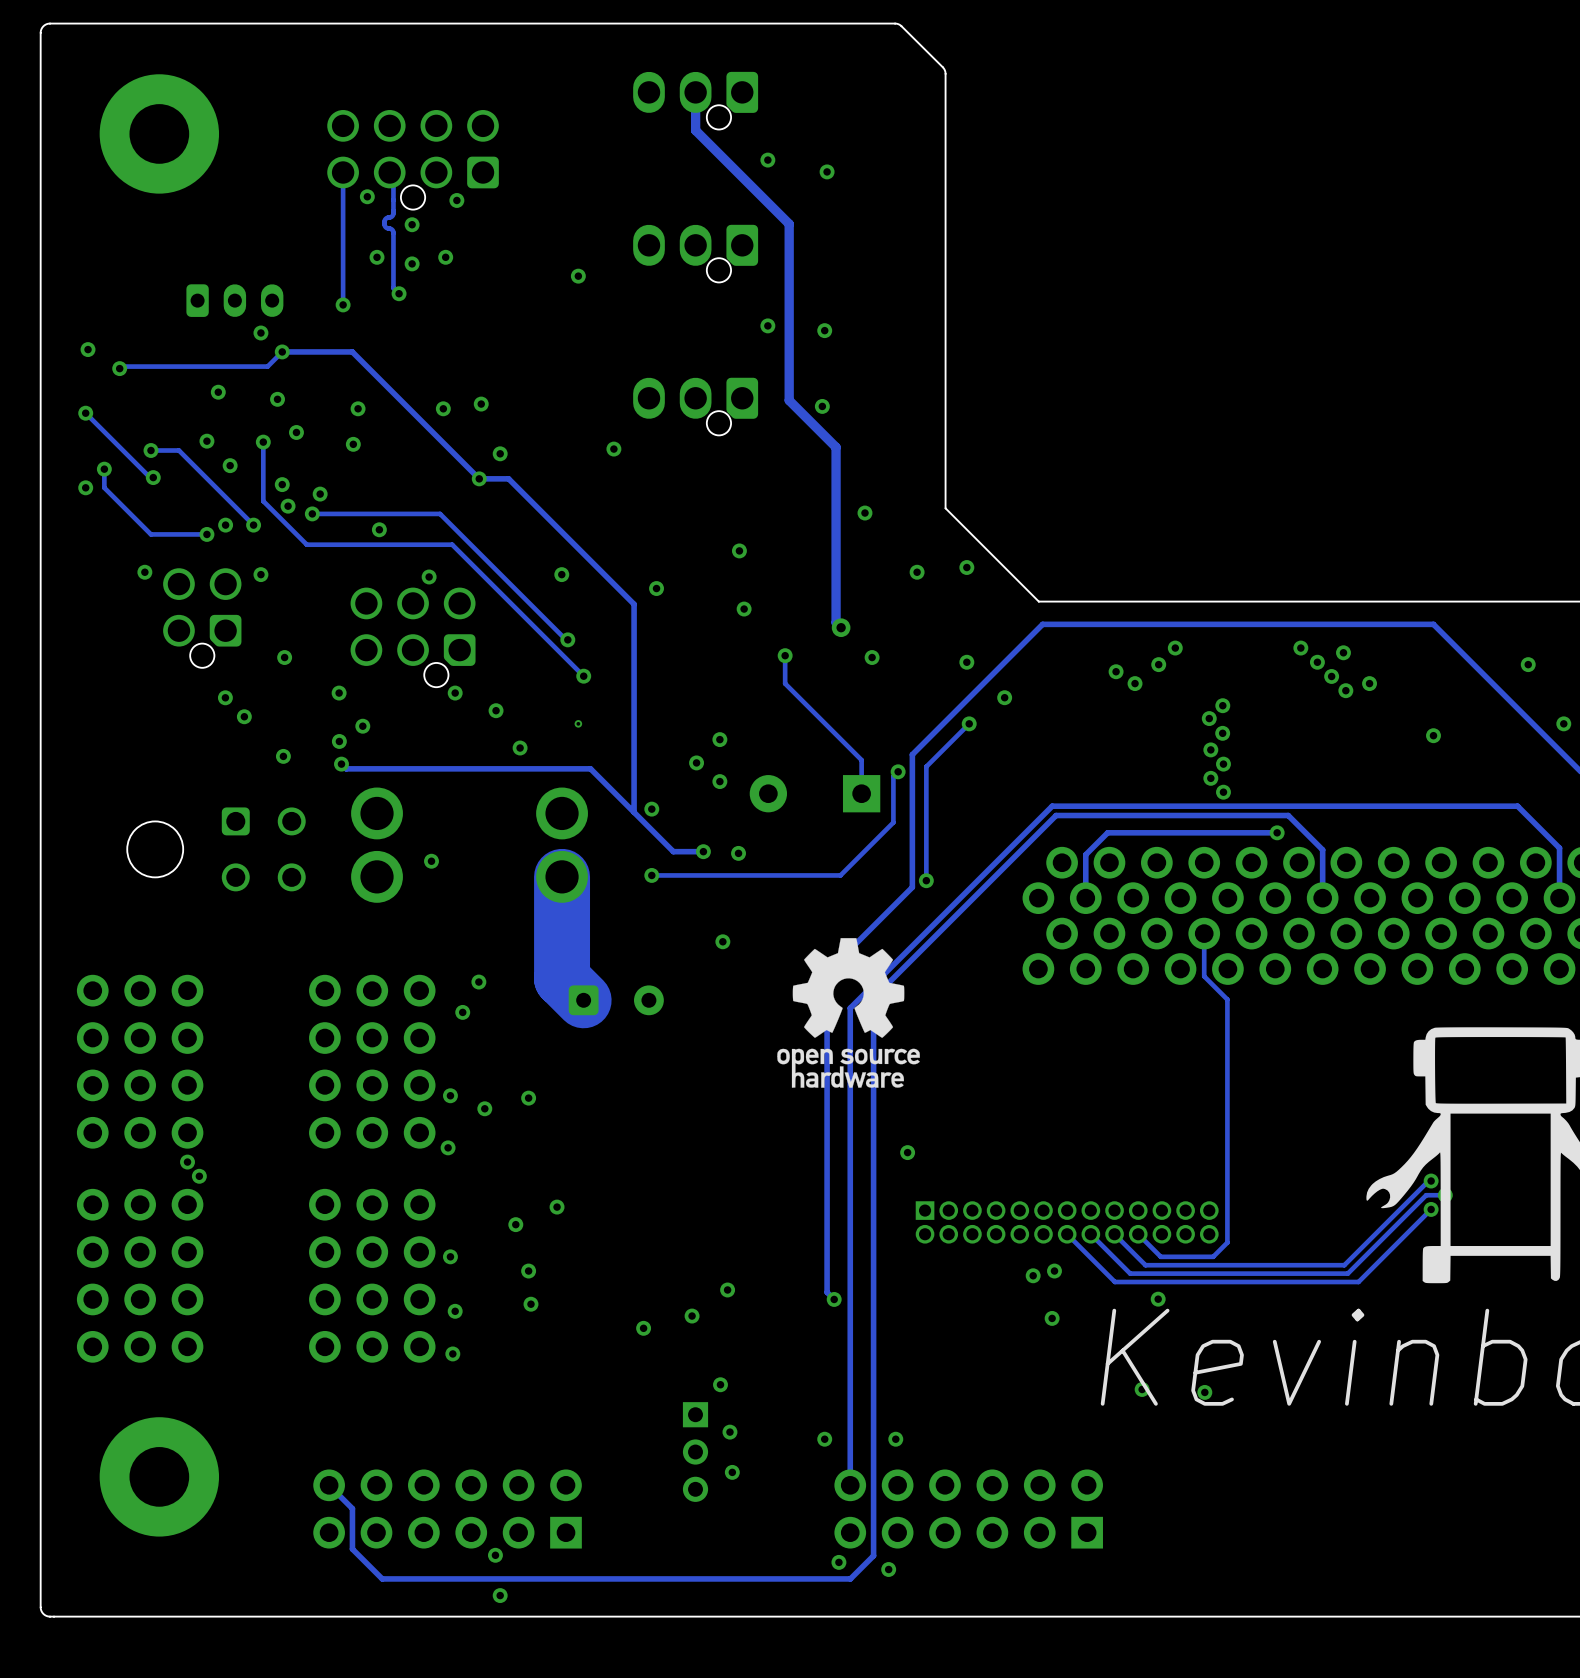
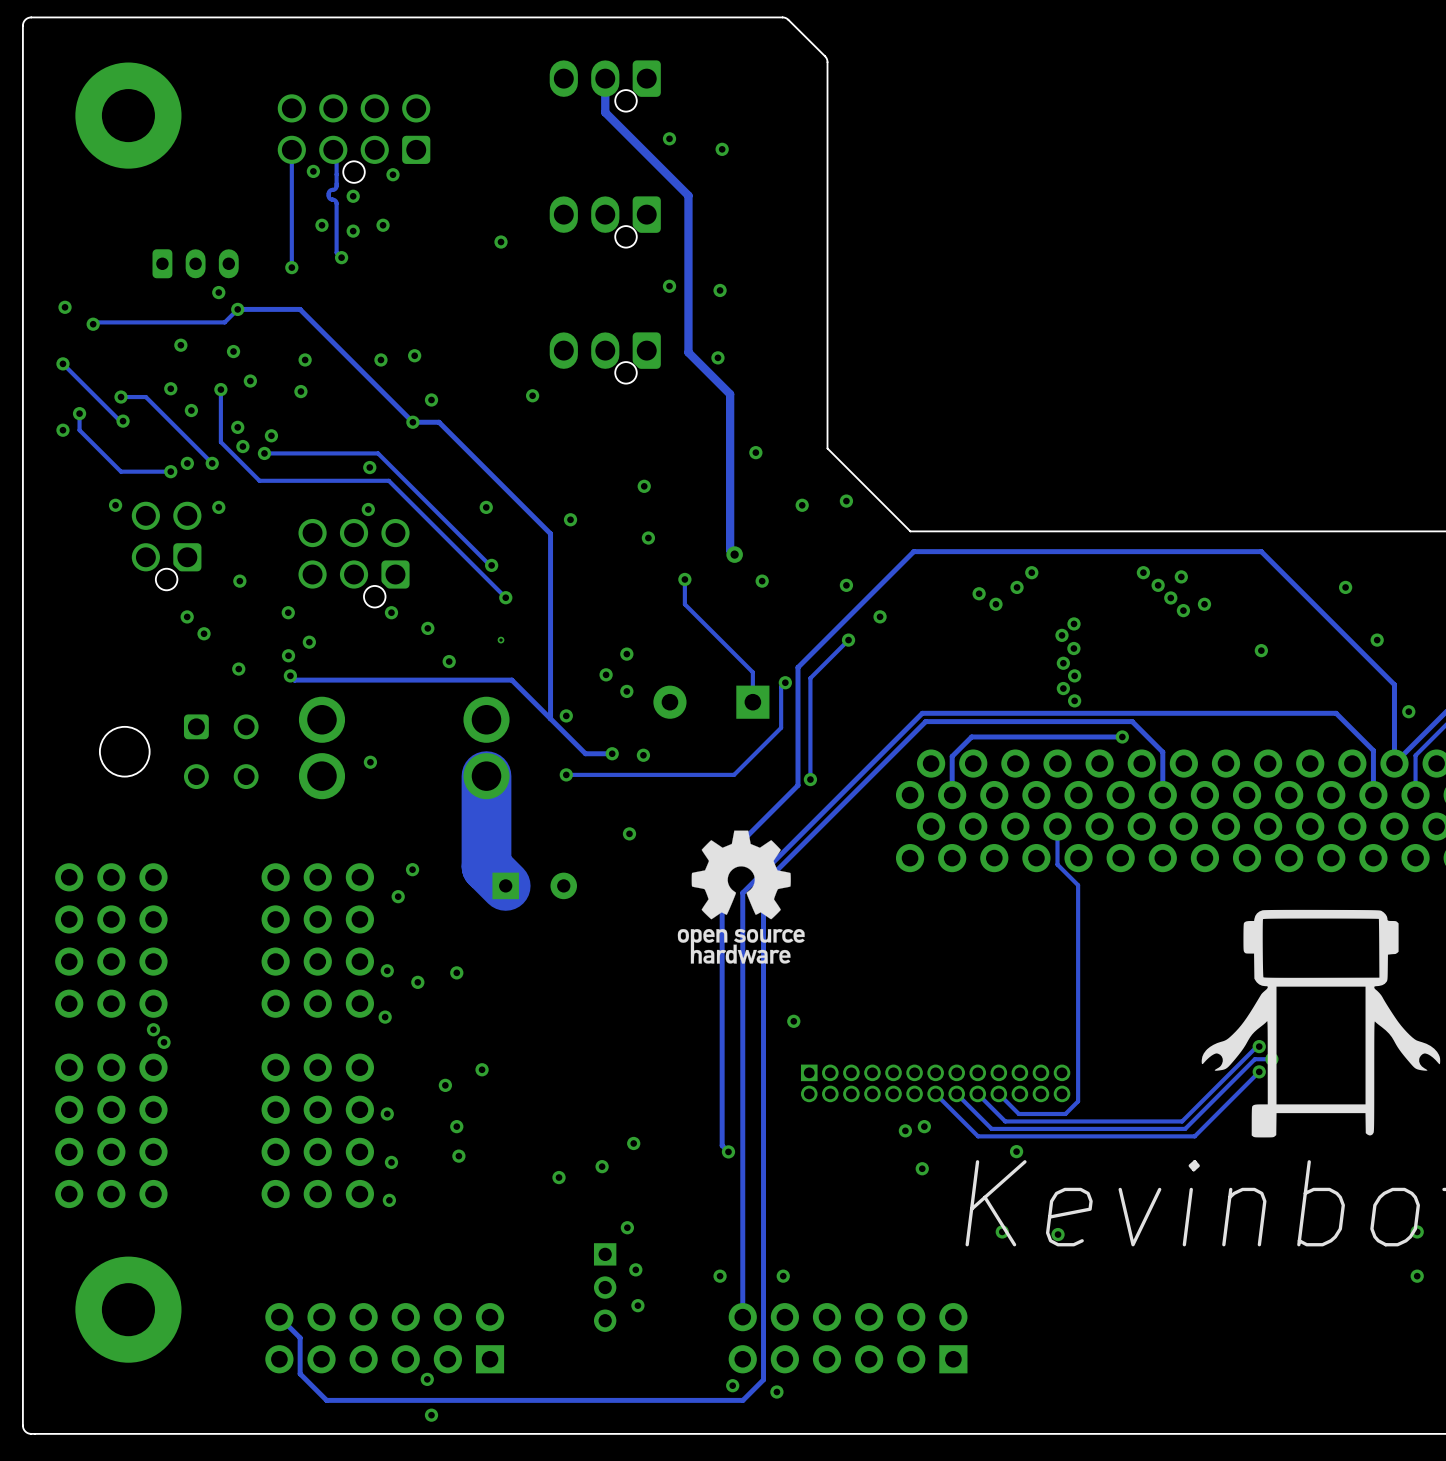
via position: (379, 529) -> (369, 467)
part footprint: [568, 985, 664, 1016] -> [492, 872, 578, 900]

